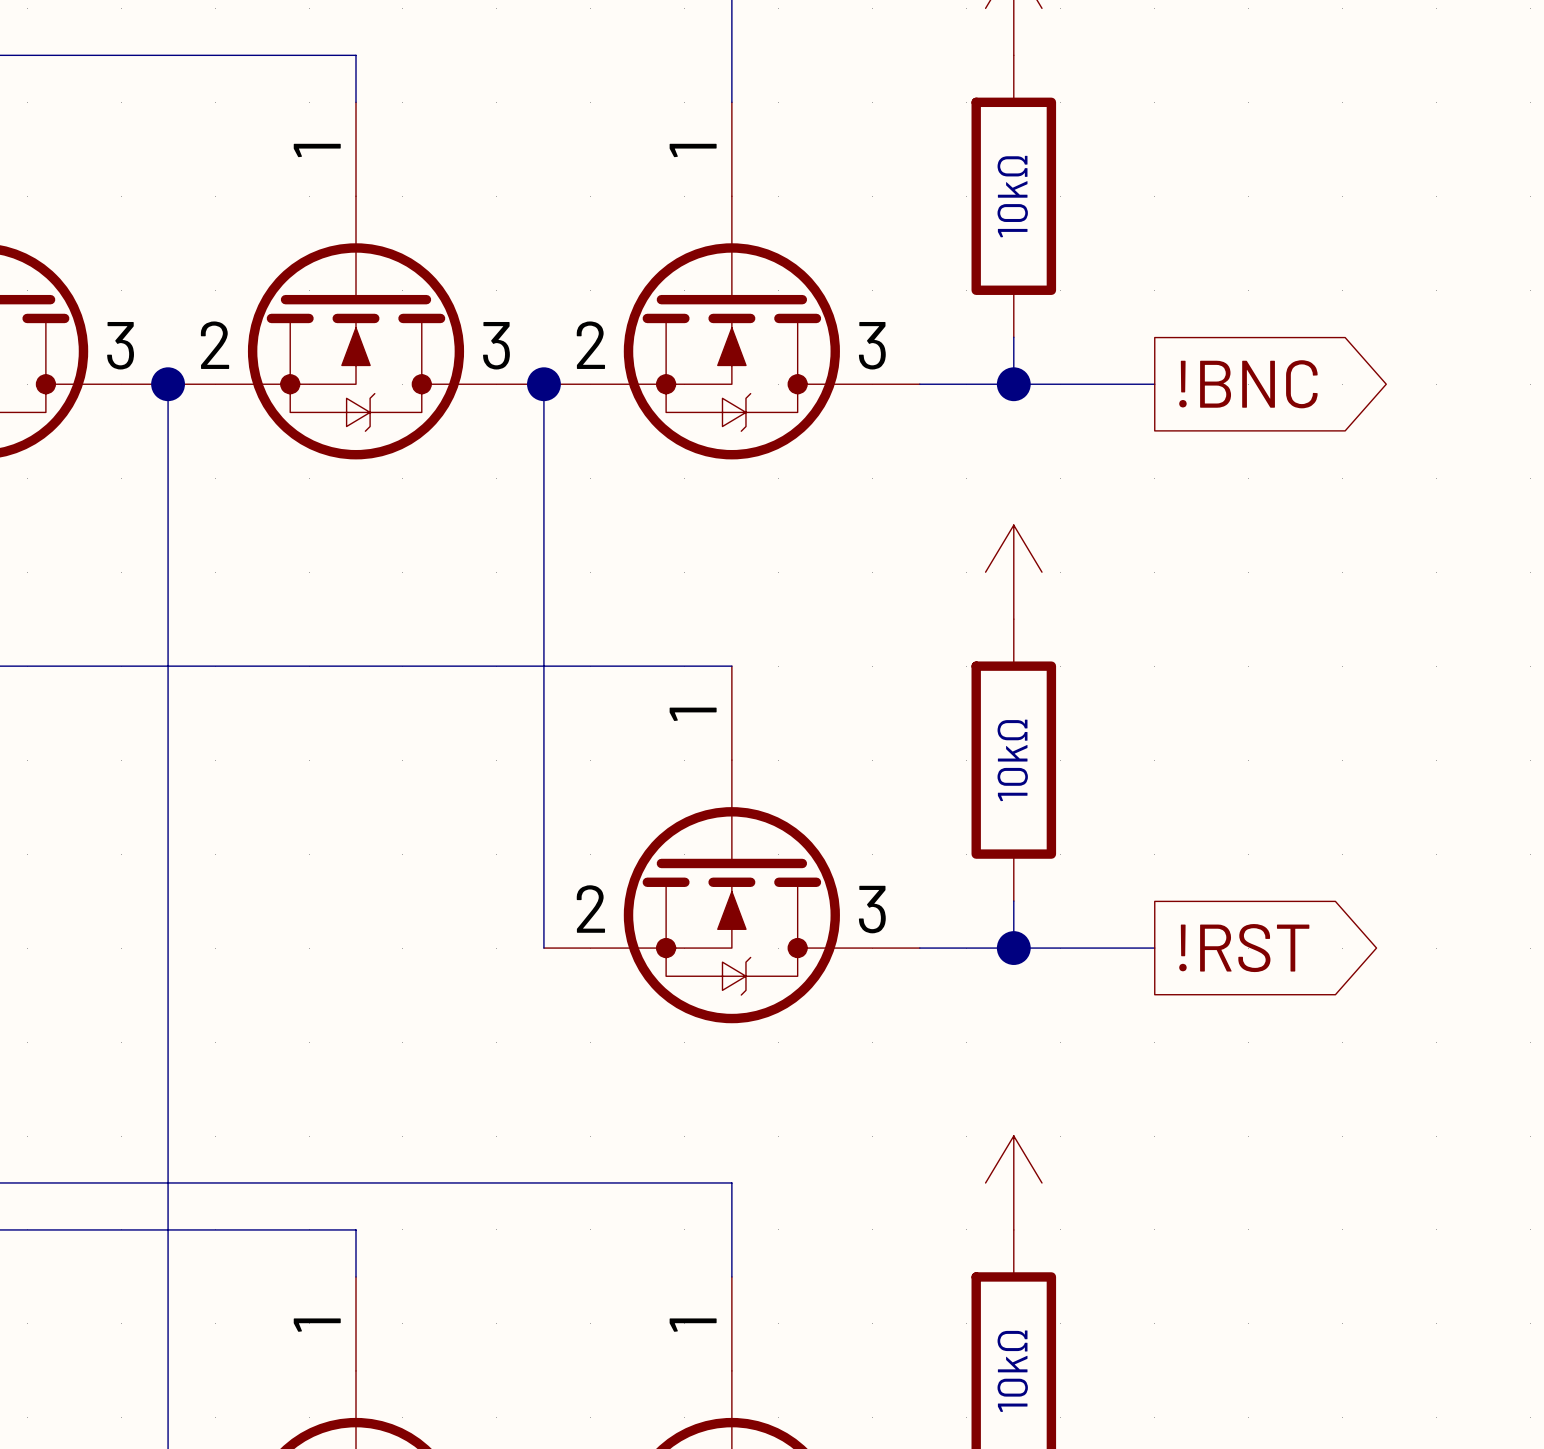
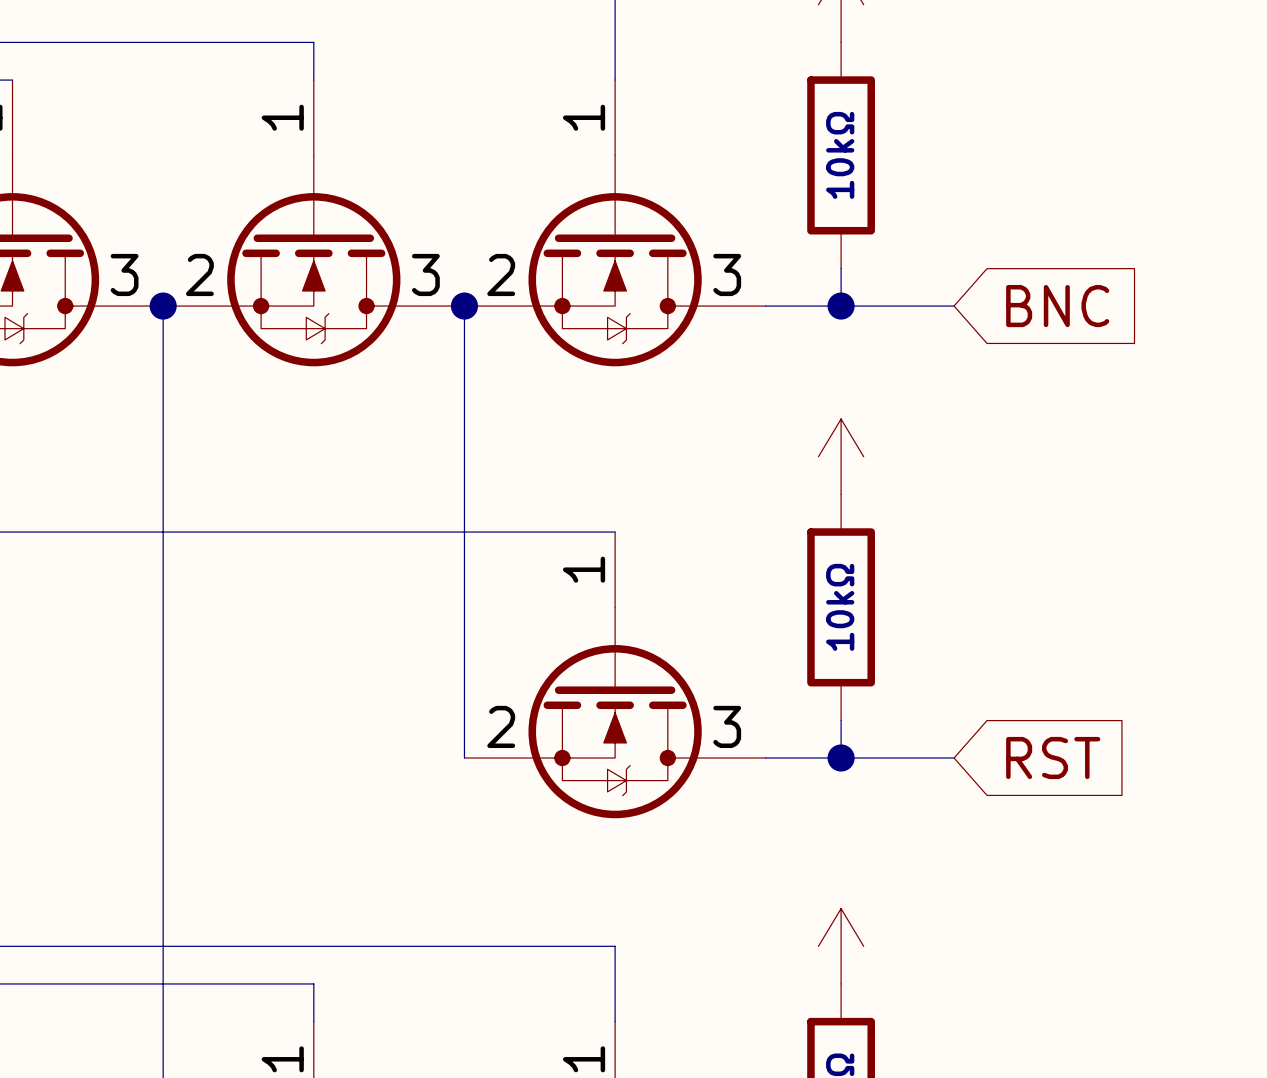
global label shape: output (1248, 384) -> input (1057, 306)
global label: !BNC (1248, 384) -> BNC (1057, 306)
global label shape: output (1244, 948) -> input (1053, 758)
global label: !RST (1244, 948) -> RST (1053, 758)

